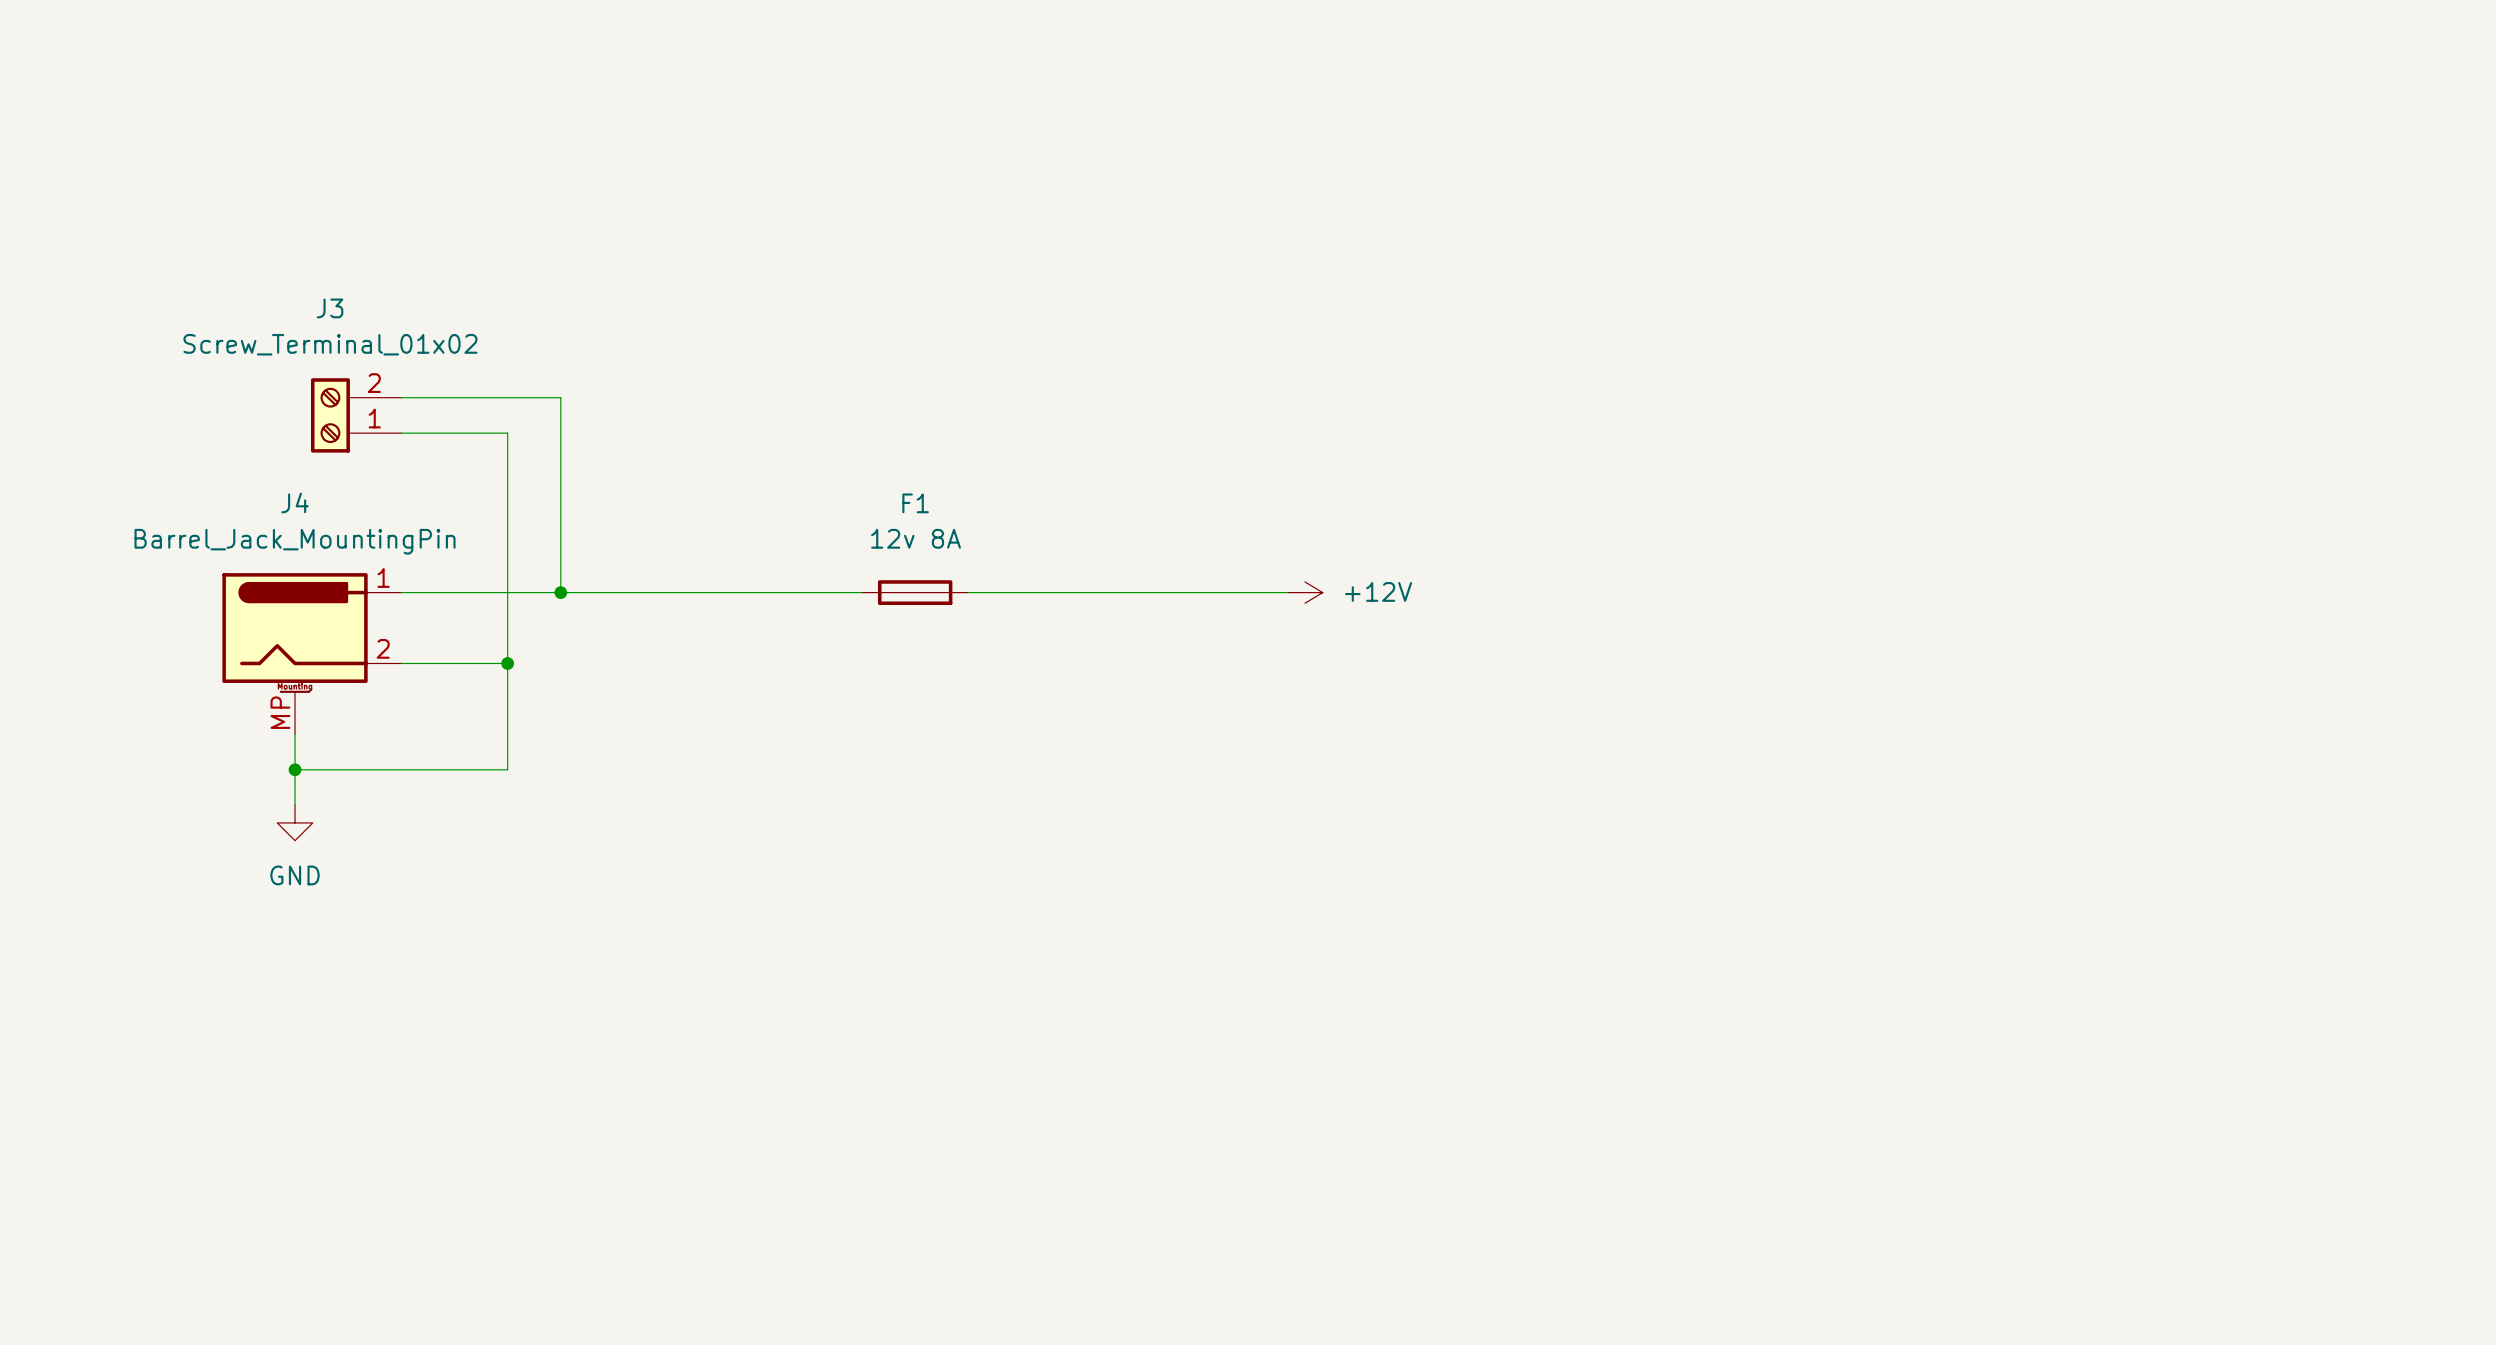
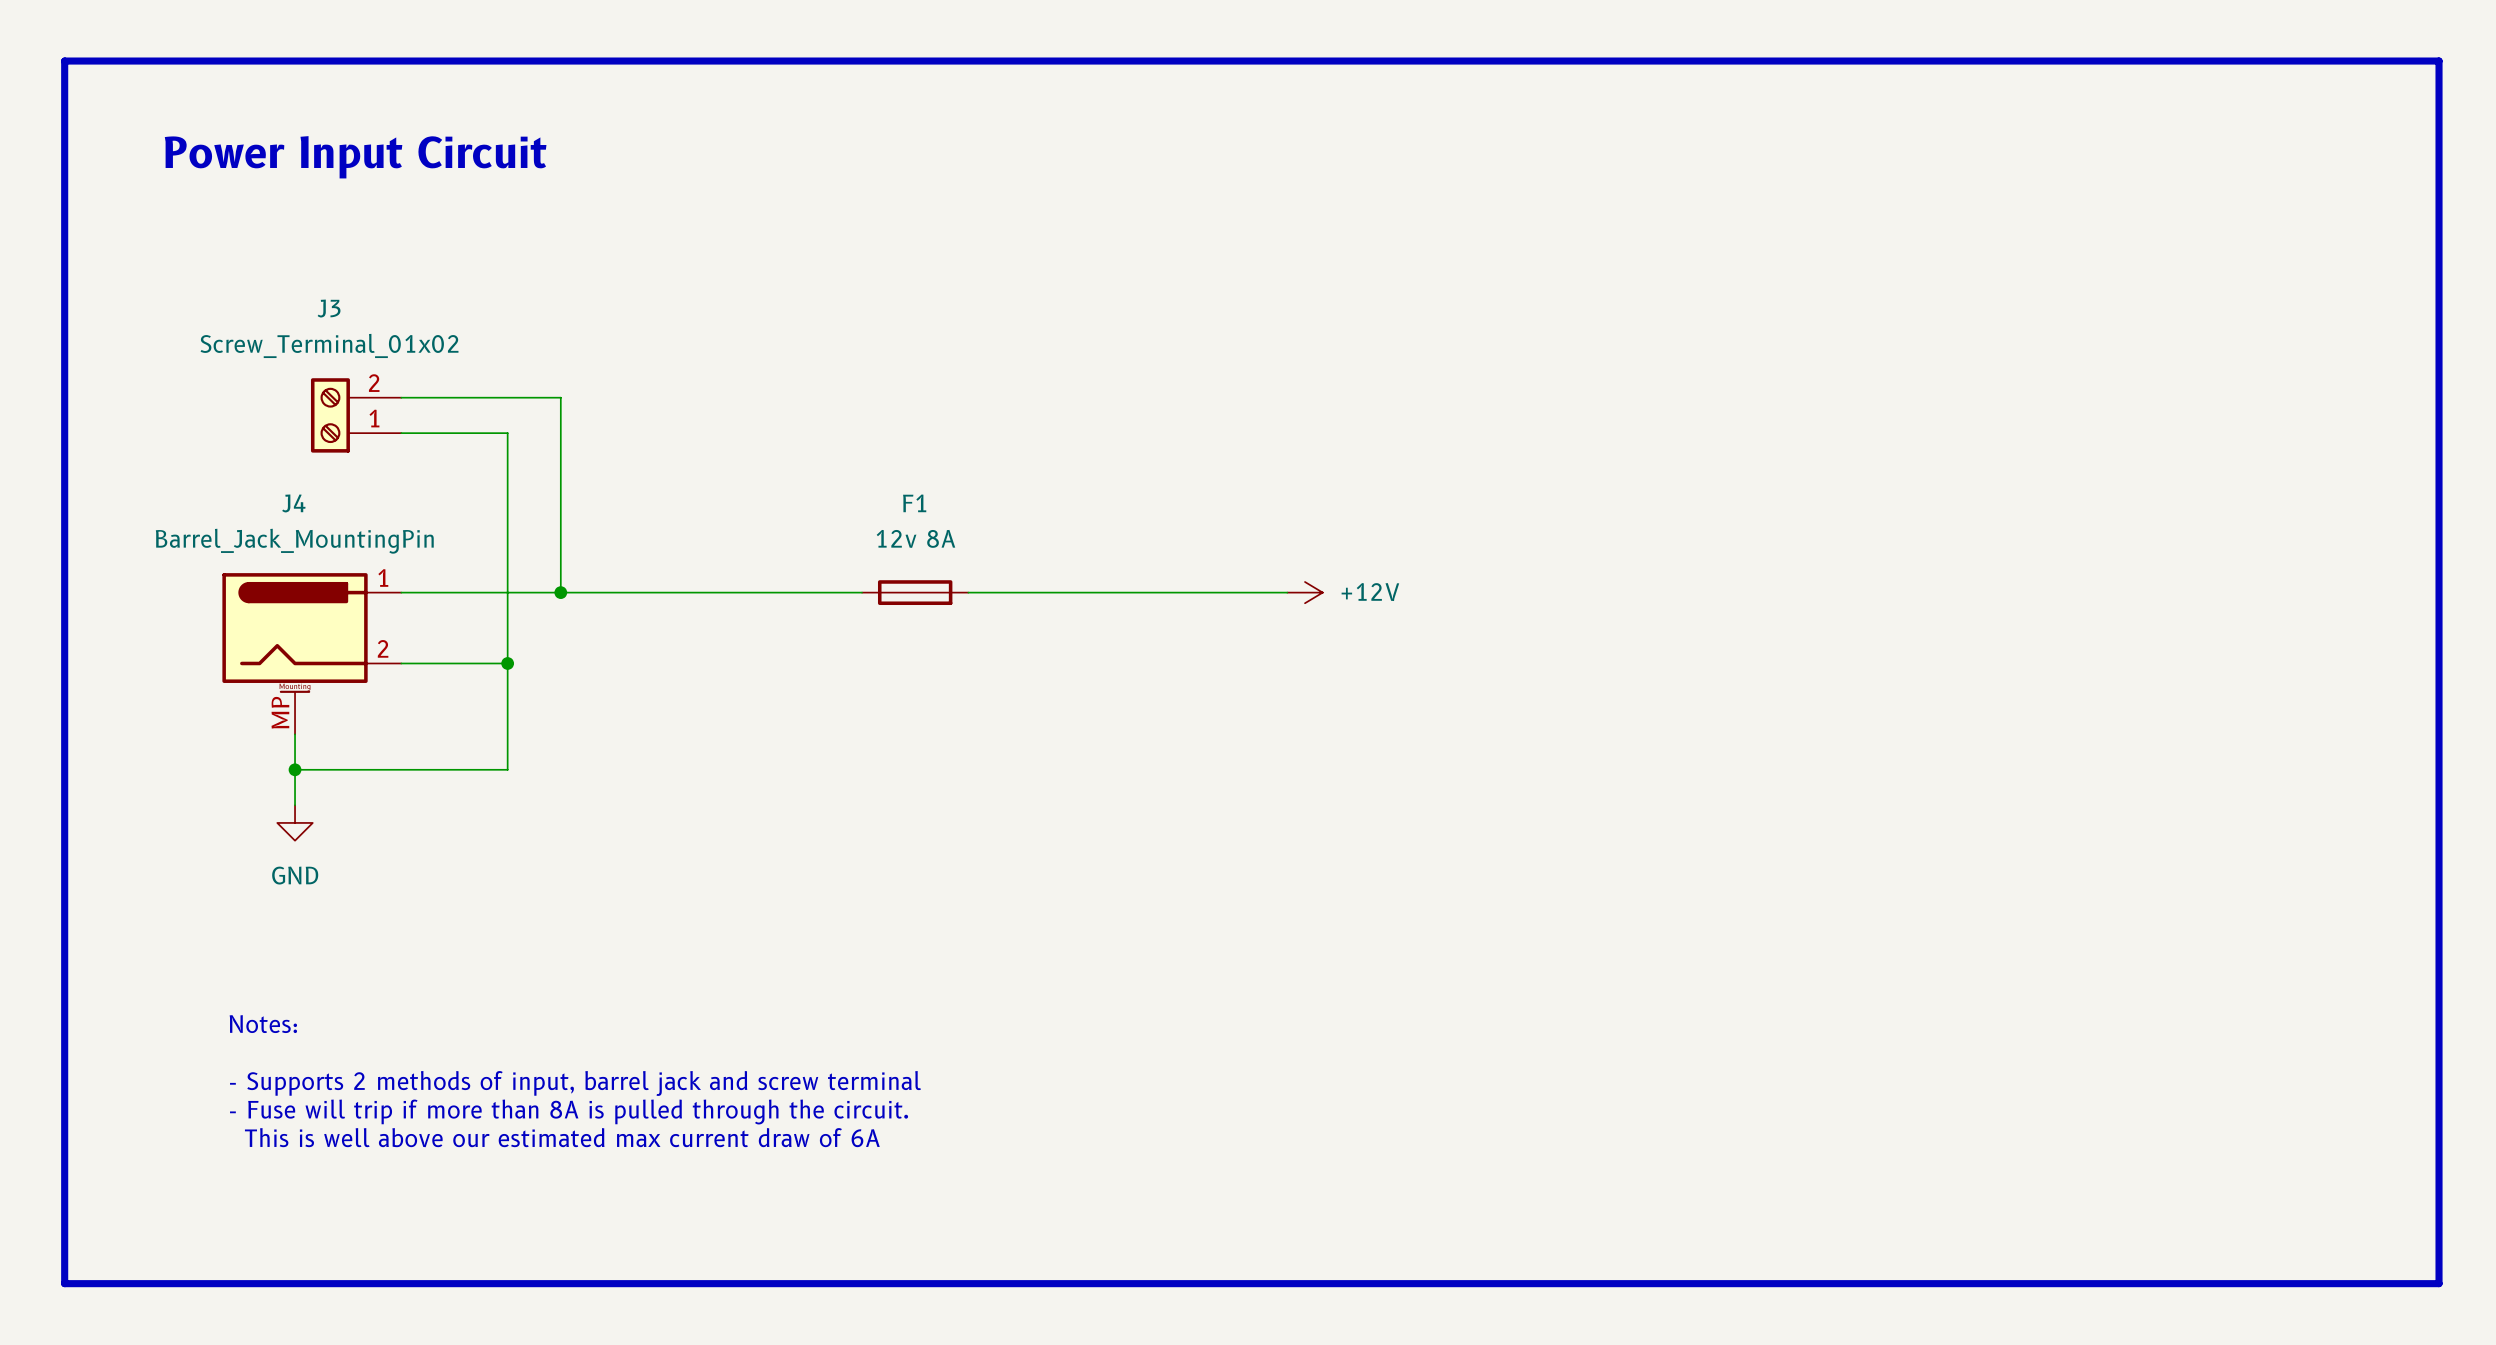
line: none -> (64, 61) (2439, 61) (2439, 1283) (64, 1283) (64, 61)
text: none -> Power Input Circuit (355, 157)
text: none -> Notes: (263, 1024)
text: none -> - Supports 2 methods of input, barrel jack and screw terminal (575, 1083)
text: none -> - Fuse will trip if more than 8A is pulled through the circuit. (569, 1112)
text: none -> This is well above our estimated max current draw of 6A (562, 1137)

